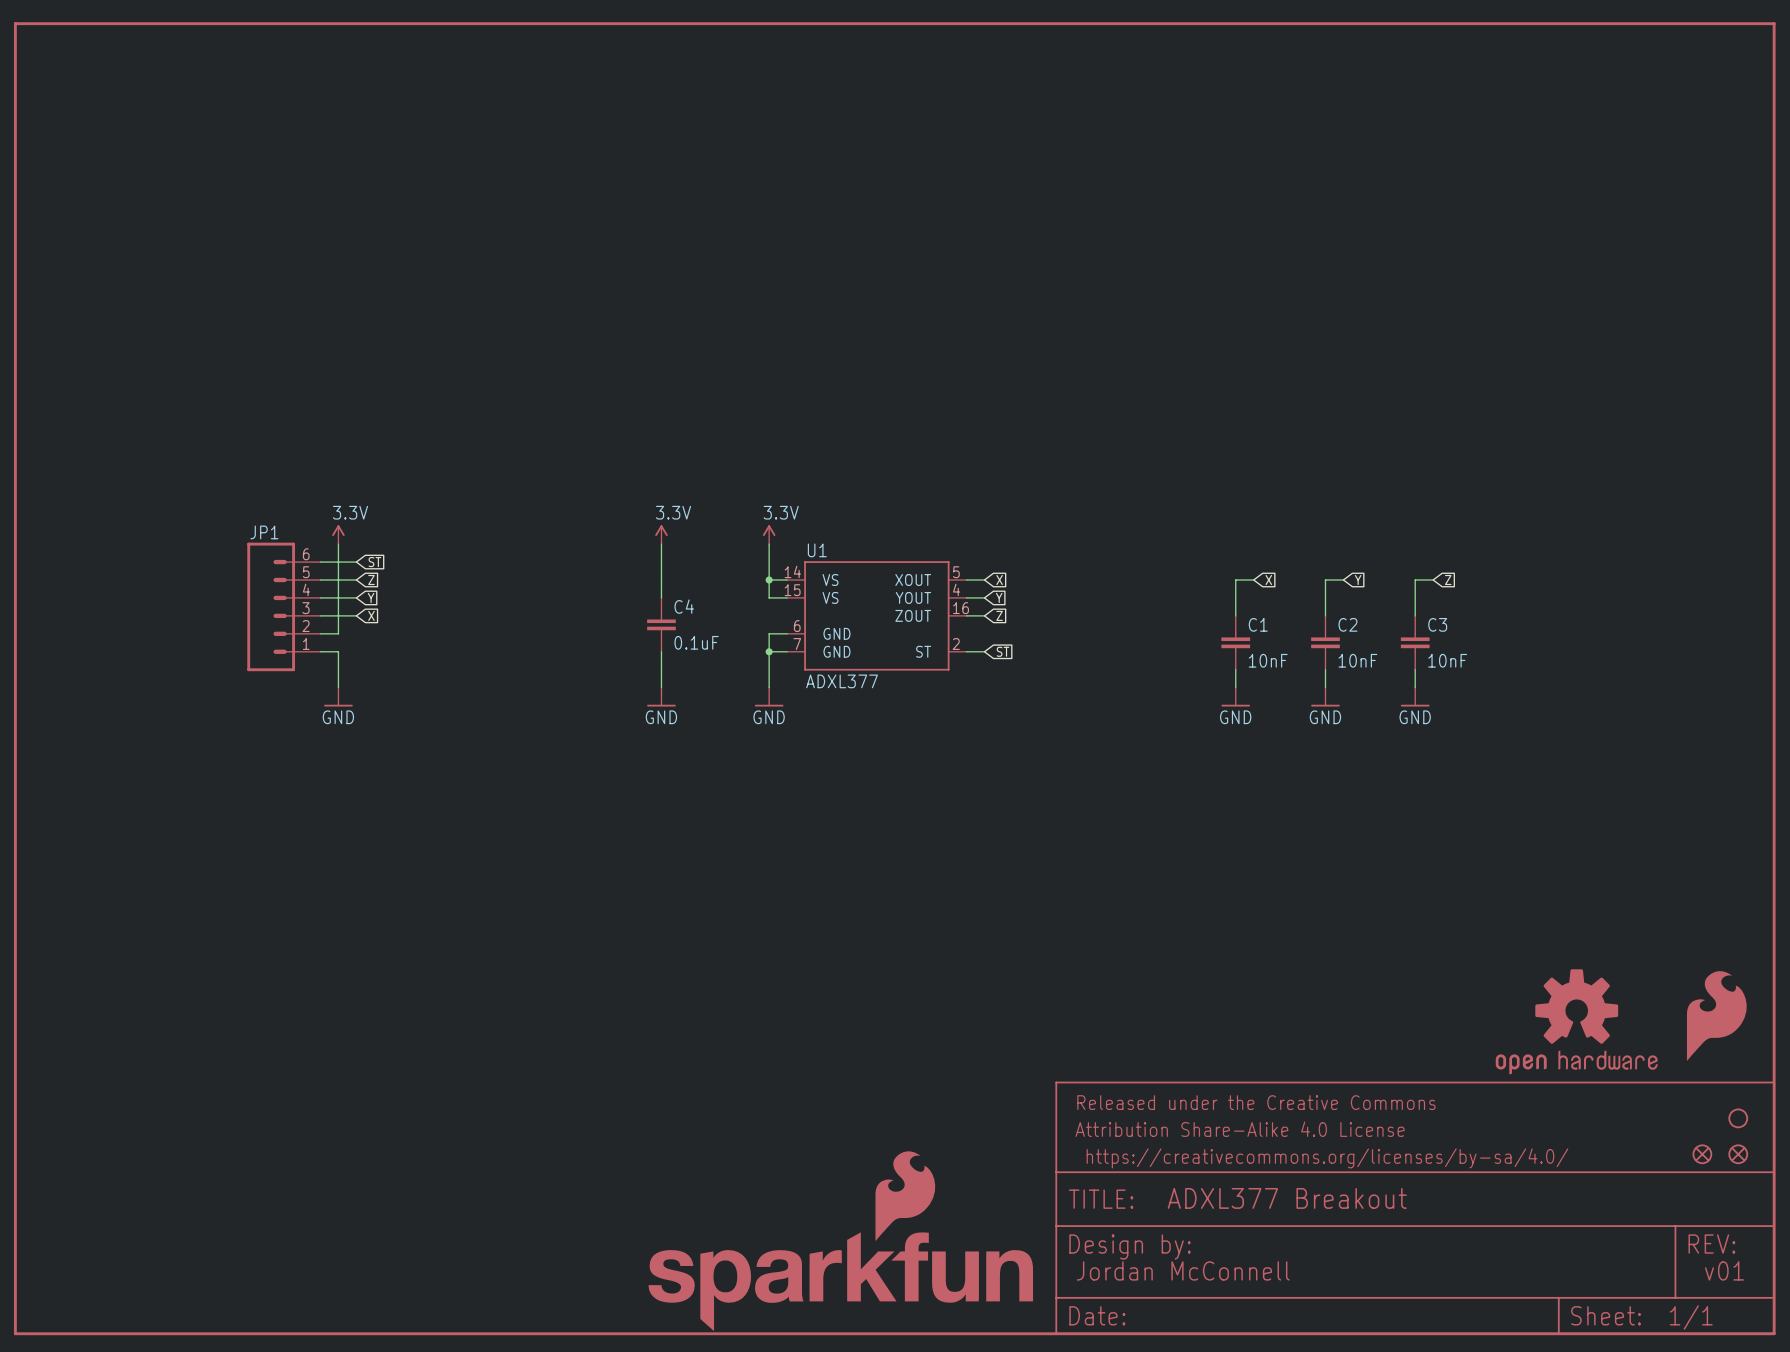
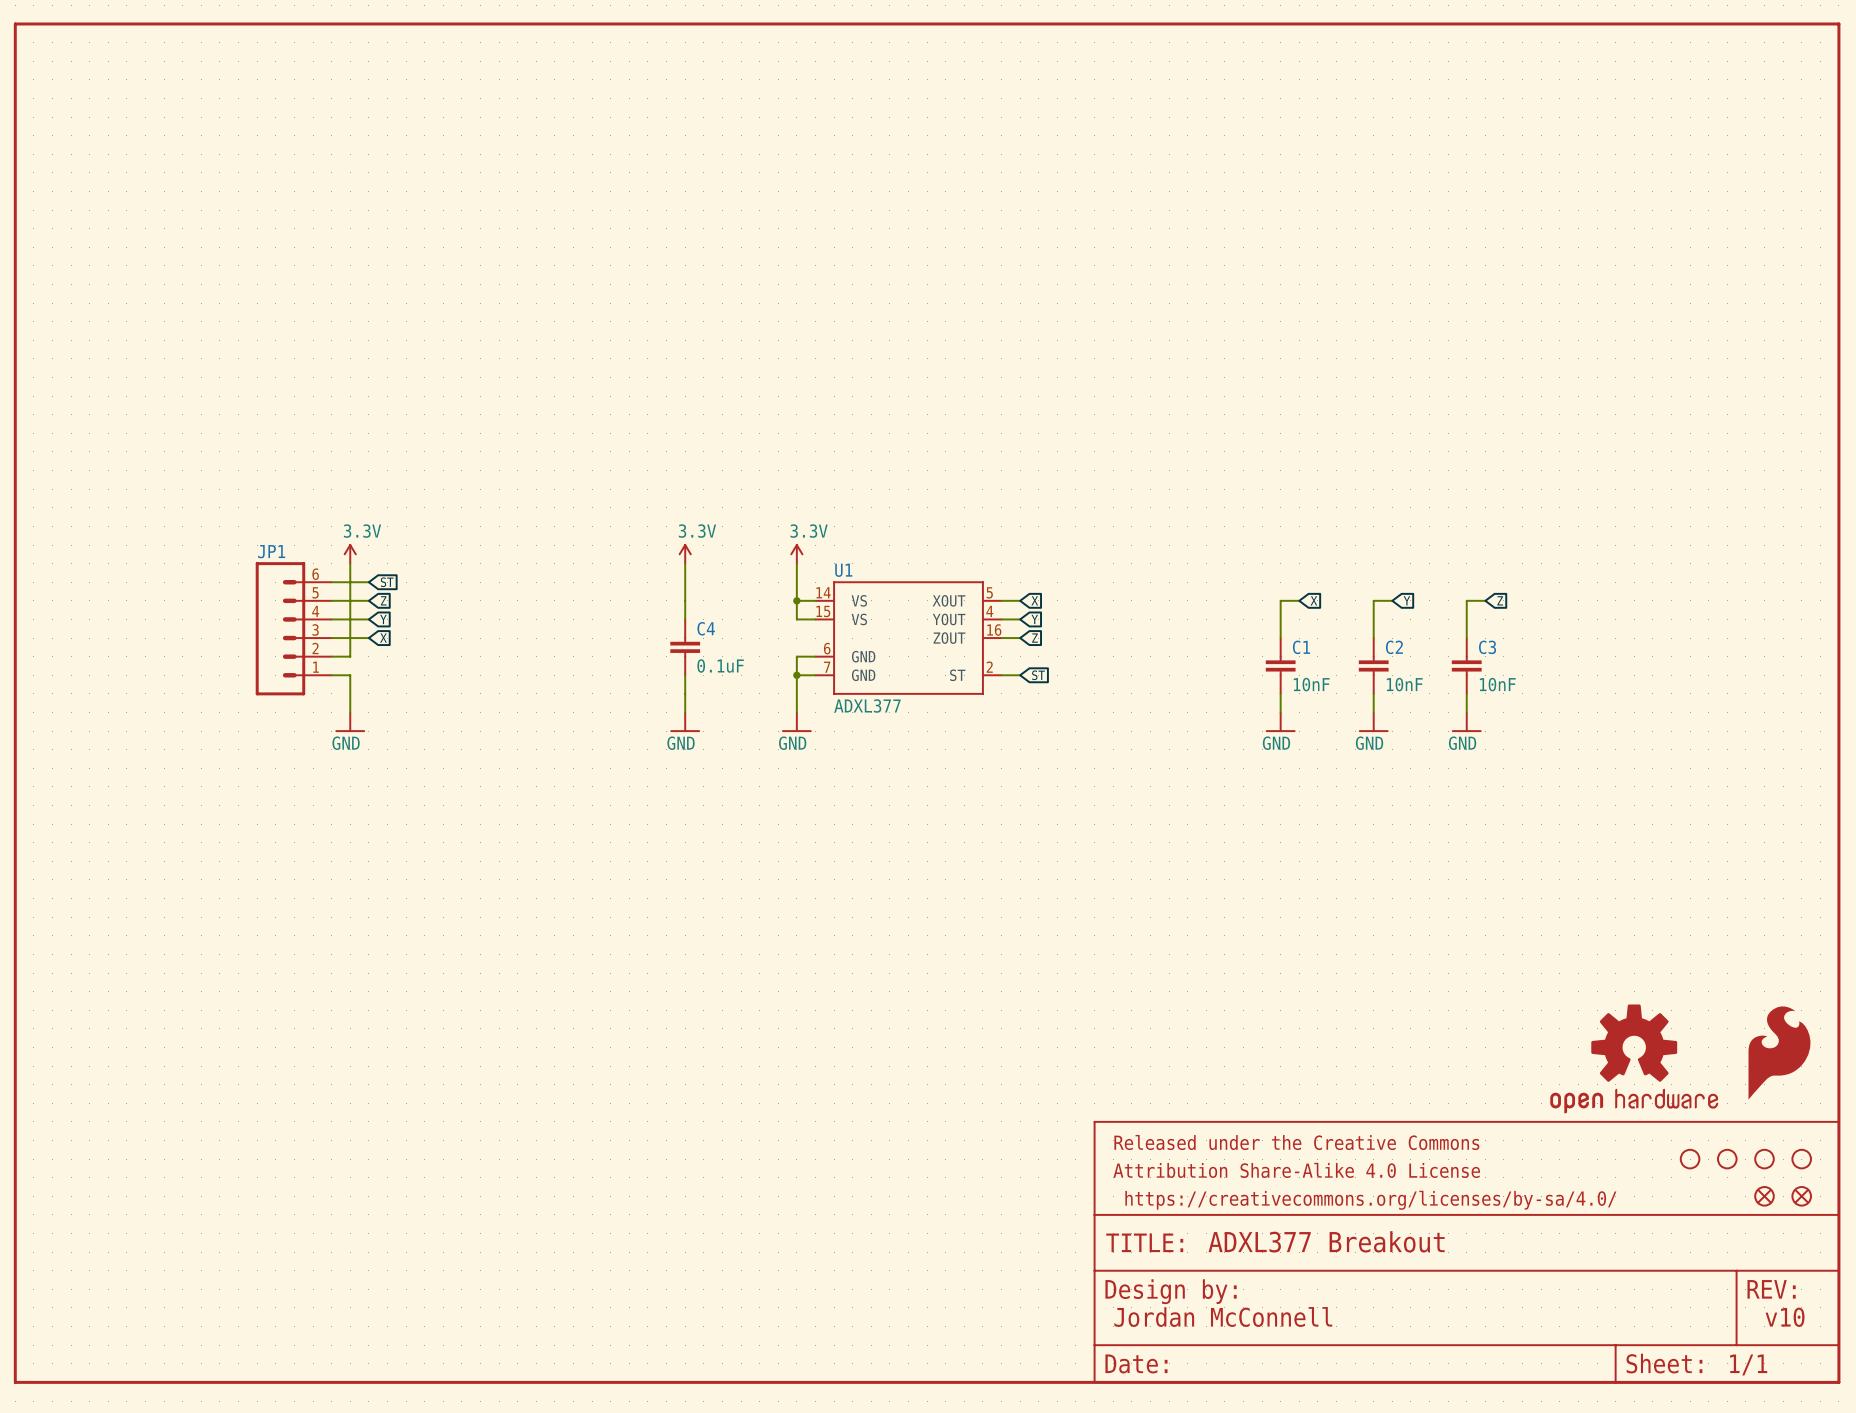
part: none -> (1690, 1159)
part: none -> (1727, 1159)
part: none -> (1764, 1159)
part: (840, 1241) -> none
text: v01 (1724, 1270) -> v10 (1785, 1317)

